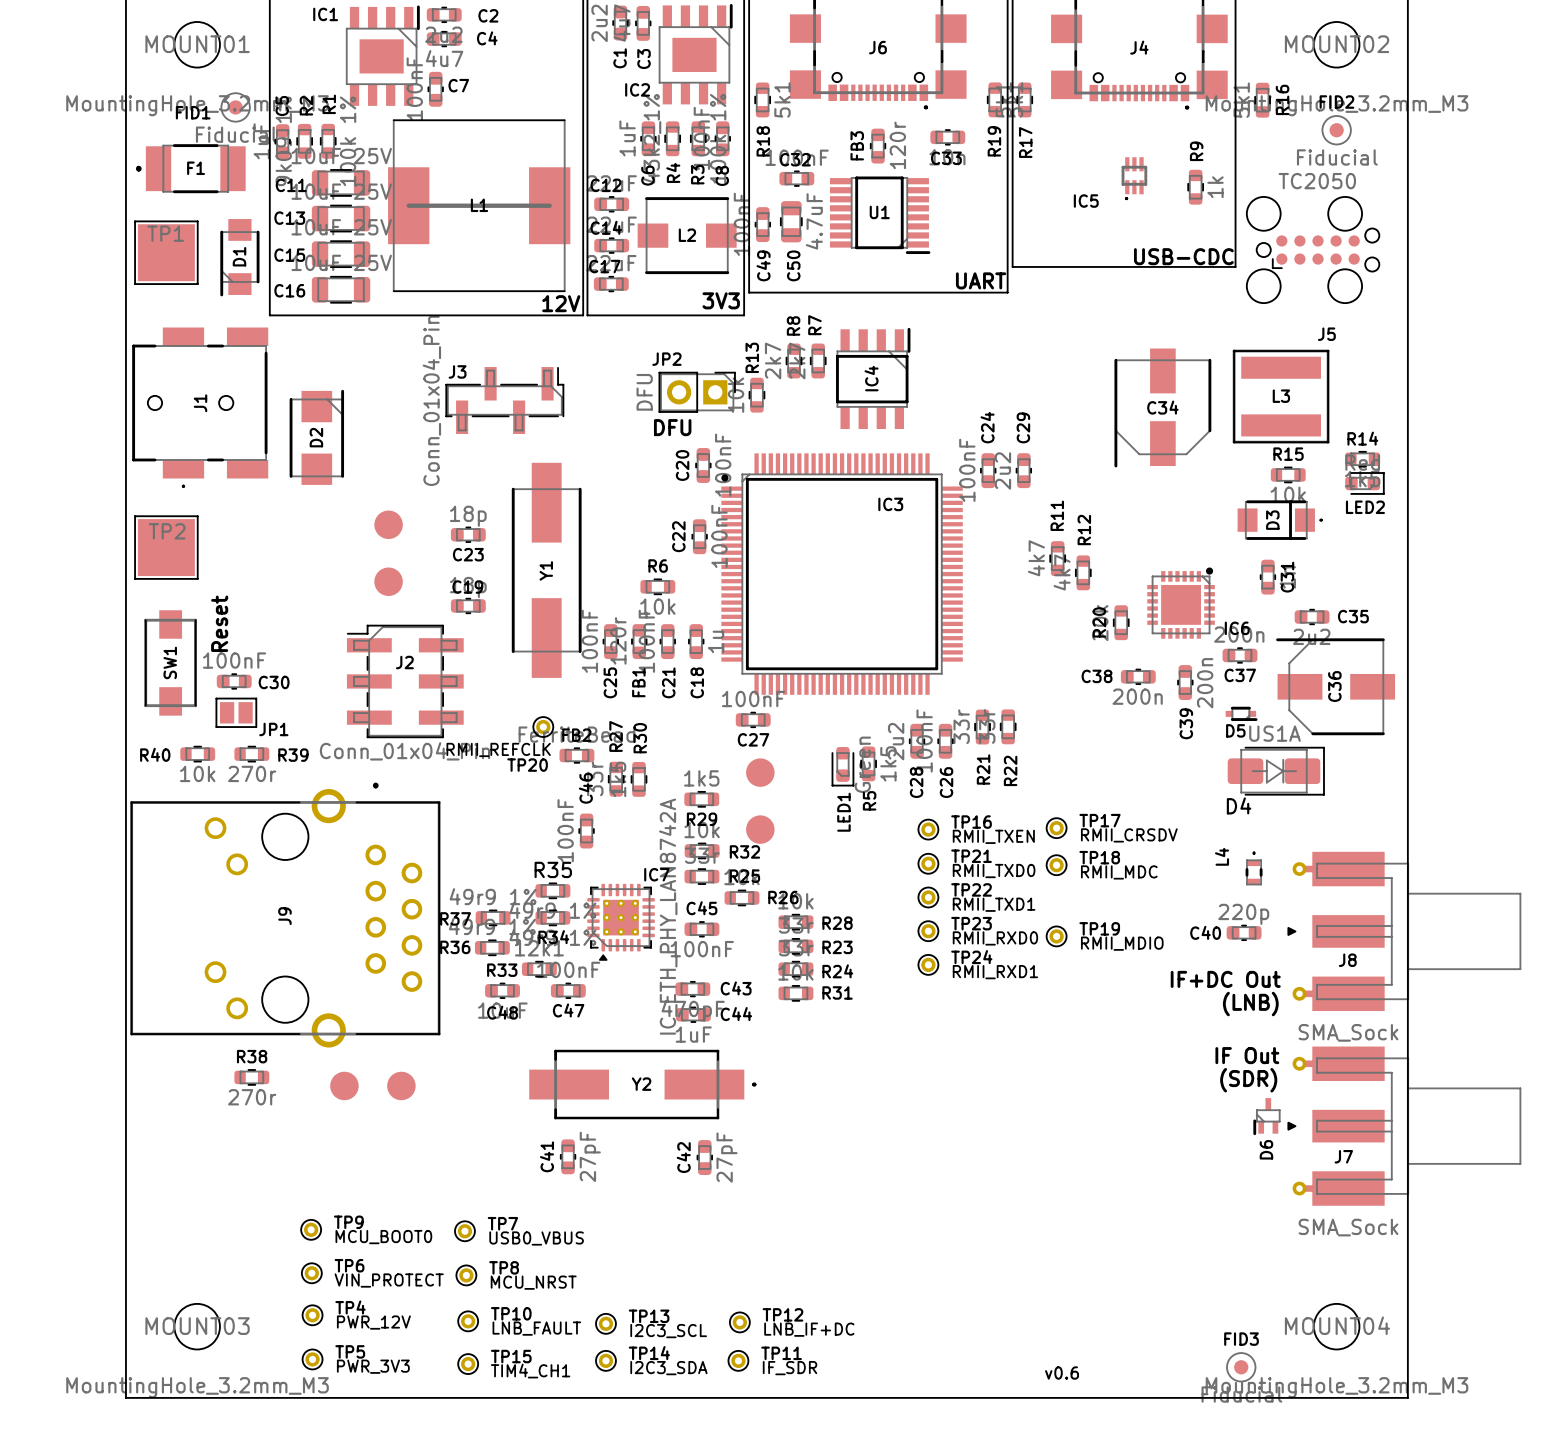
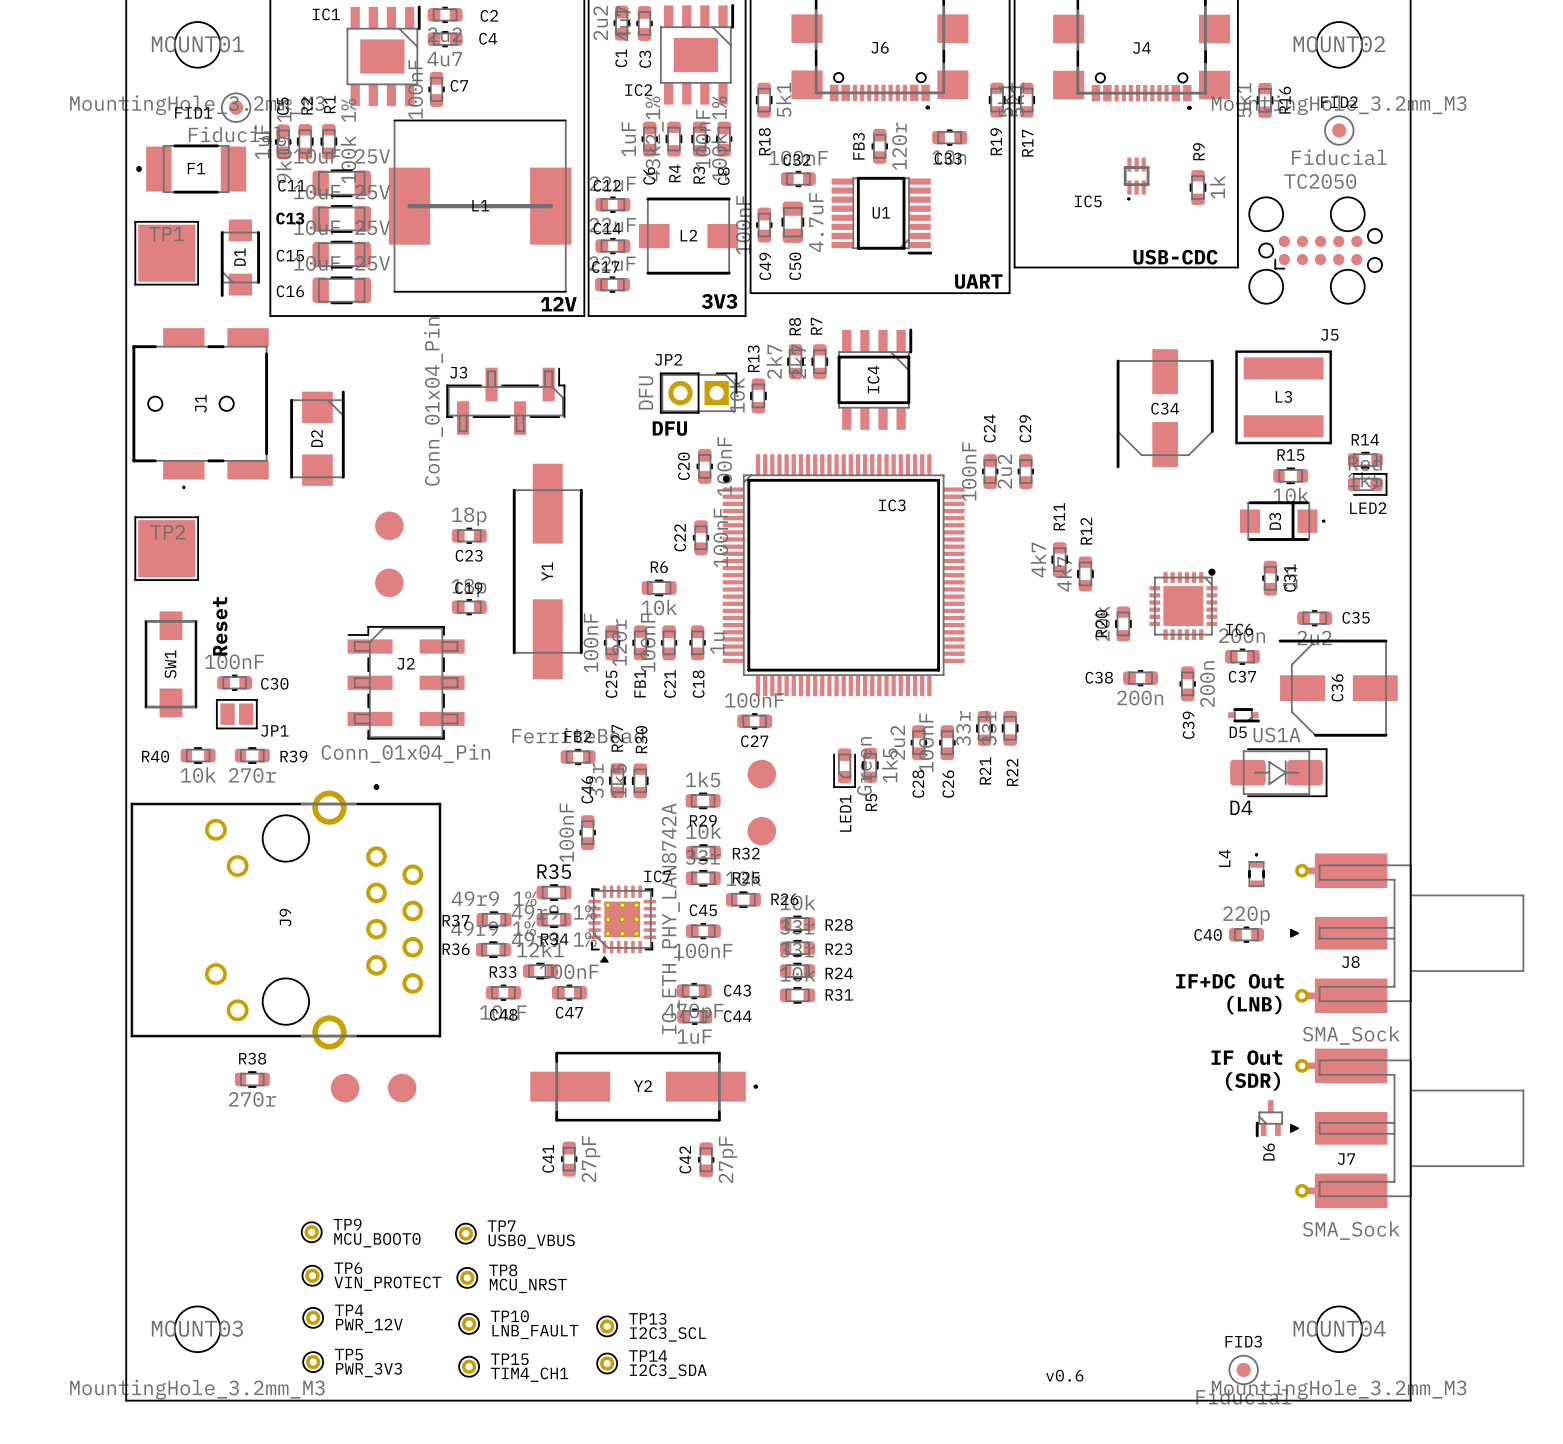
TP20: RMII_REFCLK (543, 727) -> none
TP17: RMII_CRSDV (1056, 828) -> none
TP16: RMII_TXEN (928, 829) -> none
TP21: RMII_TXD0 (928, 863) -> none
TP18: RMII_MDC (1056, 865) -> none
TP22: RMII_TXD1 (928, 897) -> none
TP23: RMII_RXD0 (928, 931) -> none
TP19: RMII_MDIO (1056, 936) -> none
TP24: RMII_RXD1 (928, 964) -> none
TP12: LNB_IF+DC (739, 1322) -> none
TP11: IF_SDR (738, 1360) -> none

